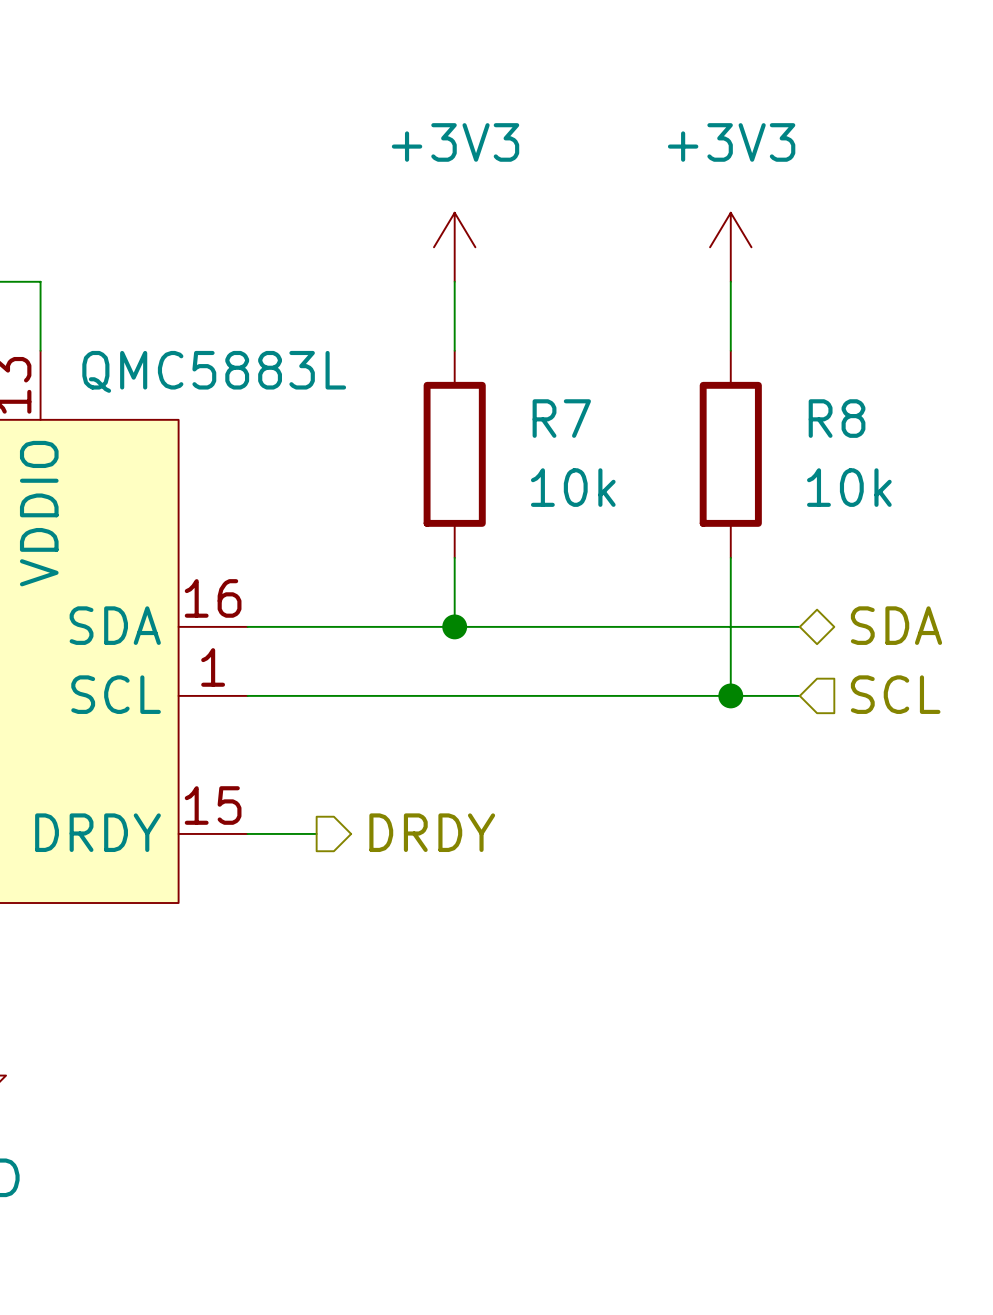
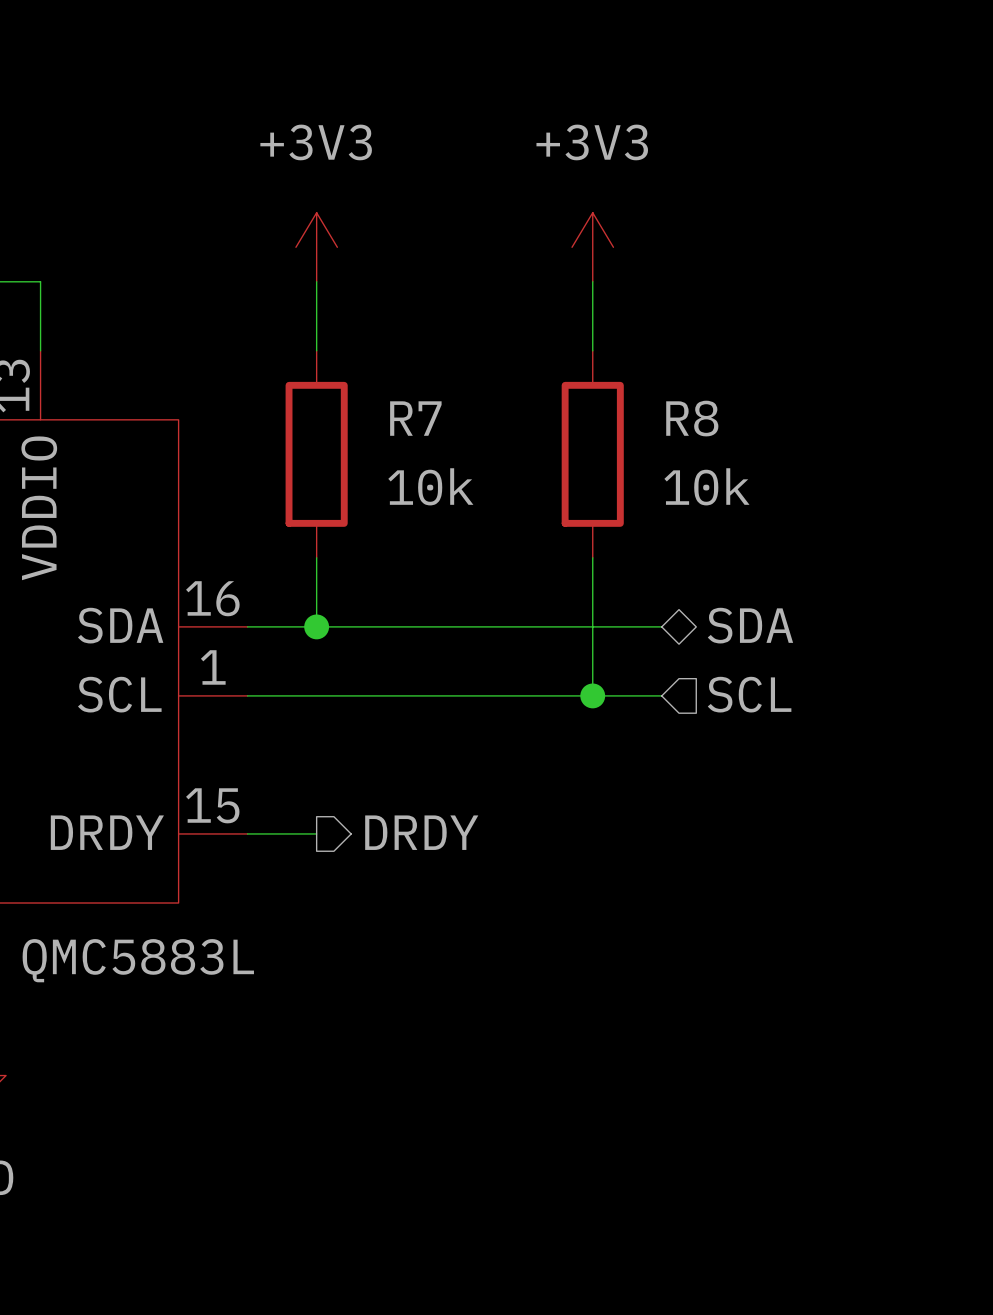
power symbol: none -> +3V3 (316, 247)
power symbol: +3V3 (454, 247) -> none
power symbol: none -> +3V3 (592, 247)
power symbol: +3V3 (730, 247) -> none
wire: (454, 281) (454, 350) -> (316, 281) (316, 350)
wire: (730, 281) (730, 350) -> (592, 281) (592, 350)
part value position: QMC5883L (214, 371) -> QMC5883L (138, 960)
R7 position: (454, 454) -> (316, 454)
R8 position: (730, 454) -> (592, 454)
wire: (454, 557) (454, 626) -> (316, 557) (316, 626)
wire: (730, 557) (730, 695) -> (592, 557) (592, 695)
hierarchical label position: SDA (896, 625) -> SDA (750, 625)
junction: none -> (316, 626)
junction: (454, 626) -> none
wire: (661, 626) (799, 626) -> none
hierarchical label position: SCL (895, 694) -> SCL (749, 694)
junction: none -> (592, 695)
wire: (661, 695) (799, 695) -> none
junction: (730, 695) -> none

